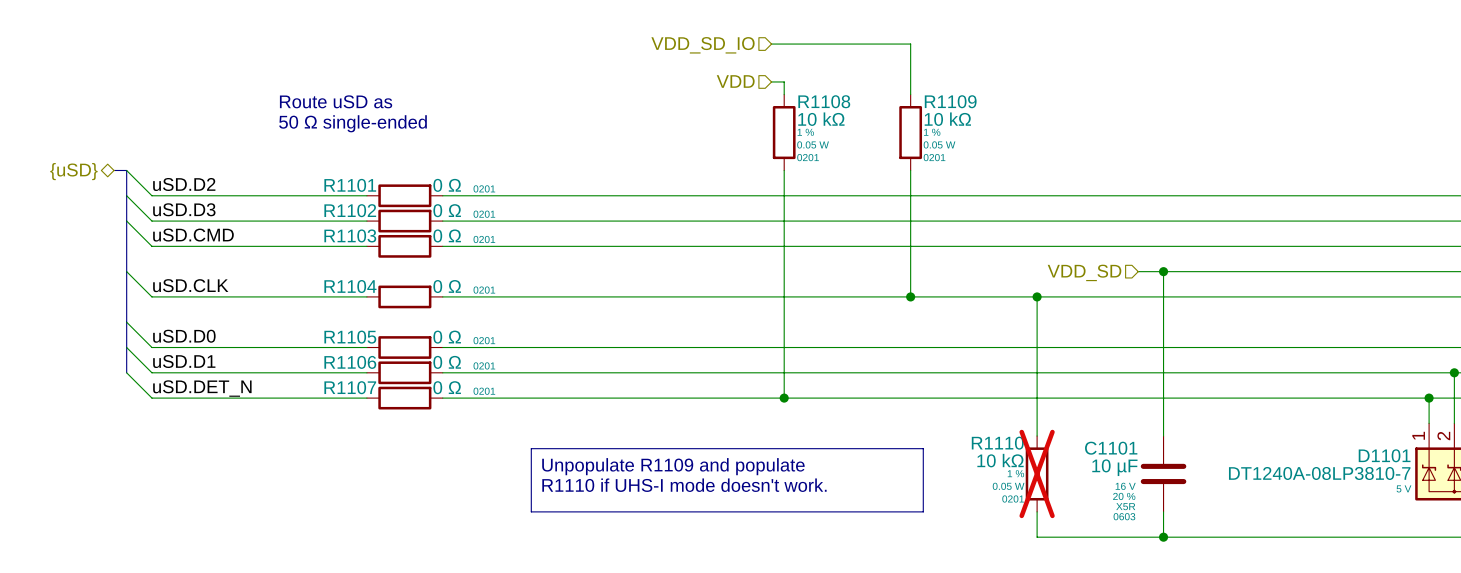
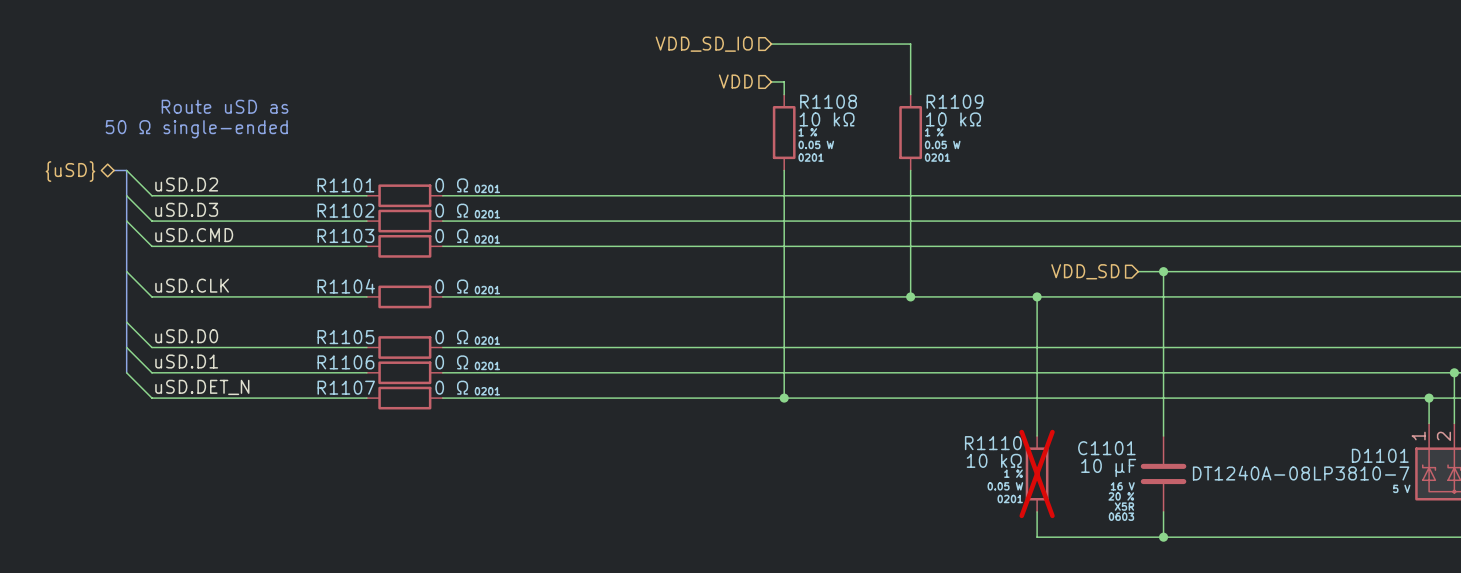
text position: Route uSD as (336, 101) -> Route uSD as (225, 106)
text position: 50 Ω single-ended (353, 123) -> 50 Ω single-ended (196, 129)
line: (531, 448) (923, 448) (923, 511) (531, 511) (531, 448) -> none
text: Unpopulate R1109 and populate (673, 466) -> none
text: R1110 if UHS-I mode doesn't work. (684, 485) -> none

